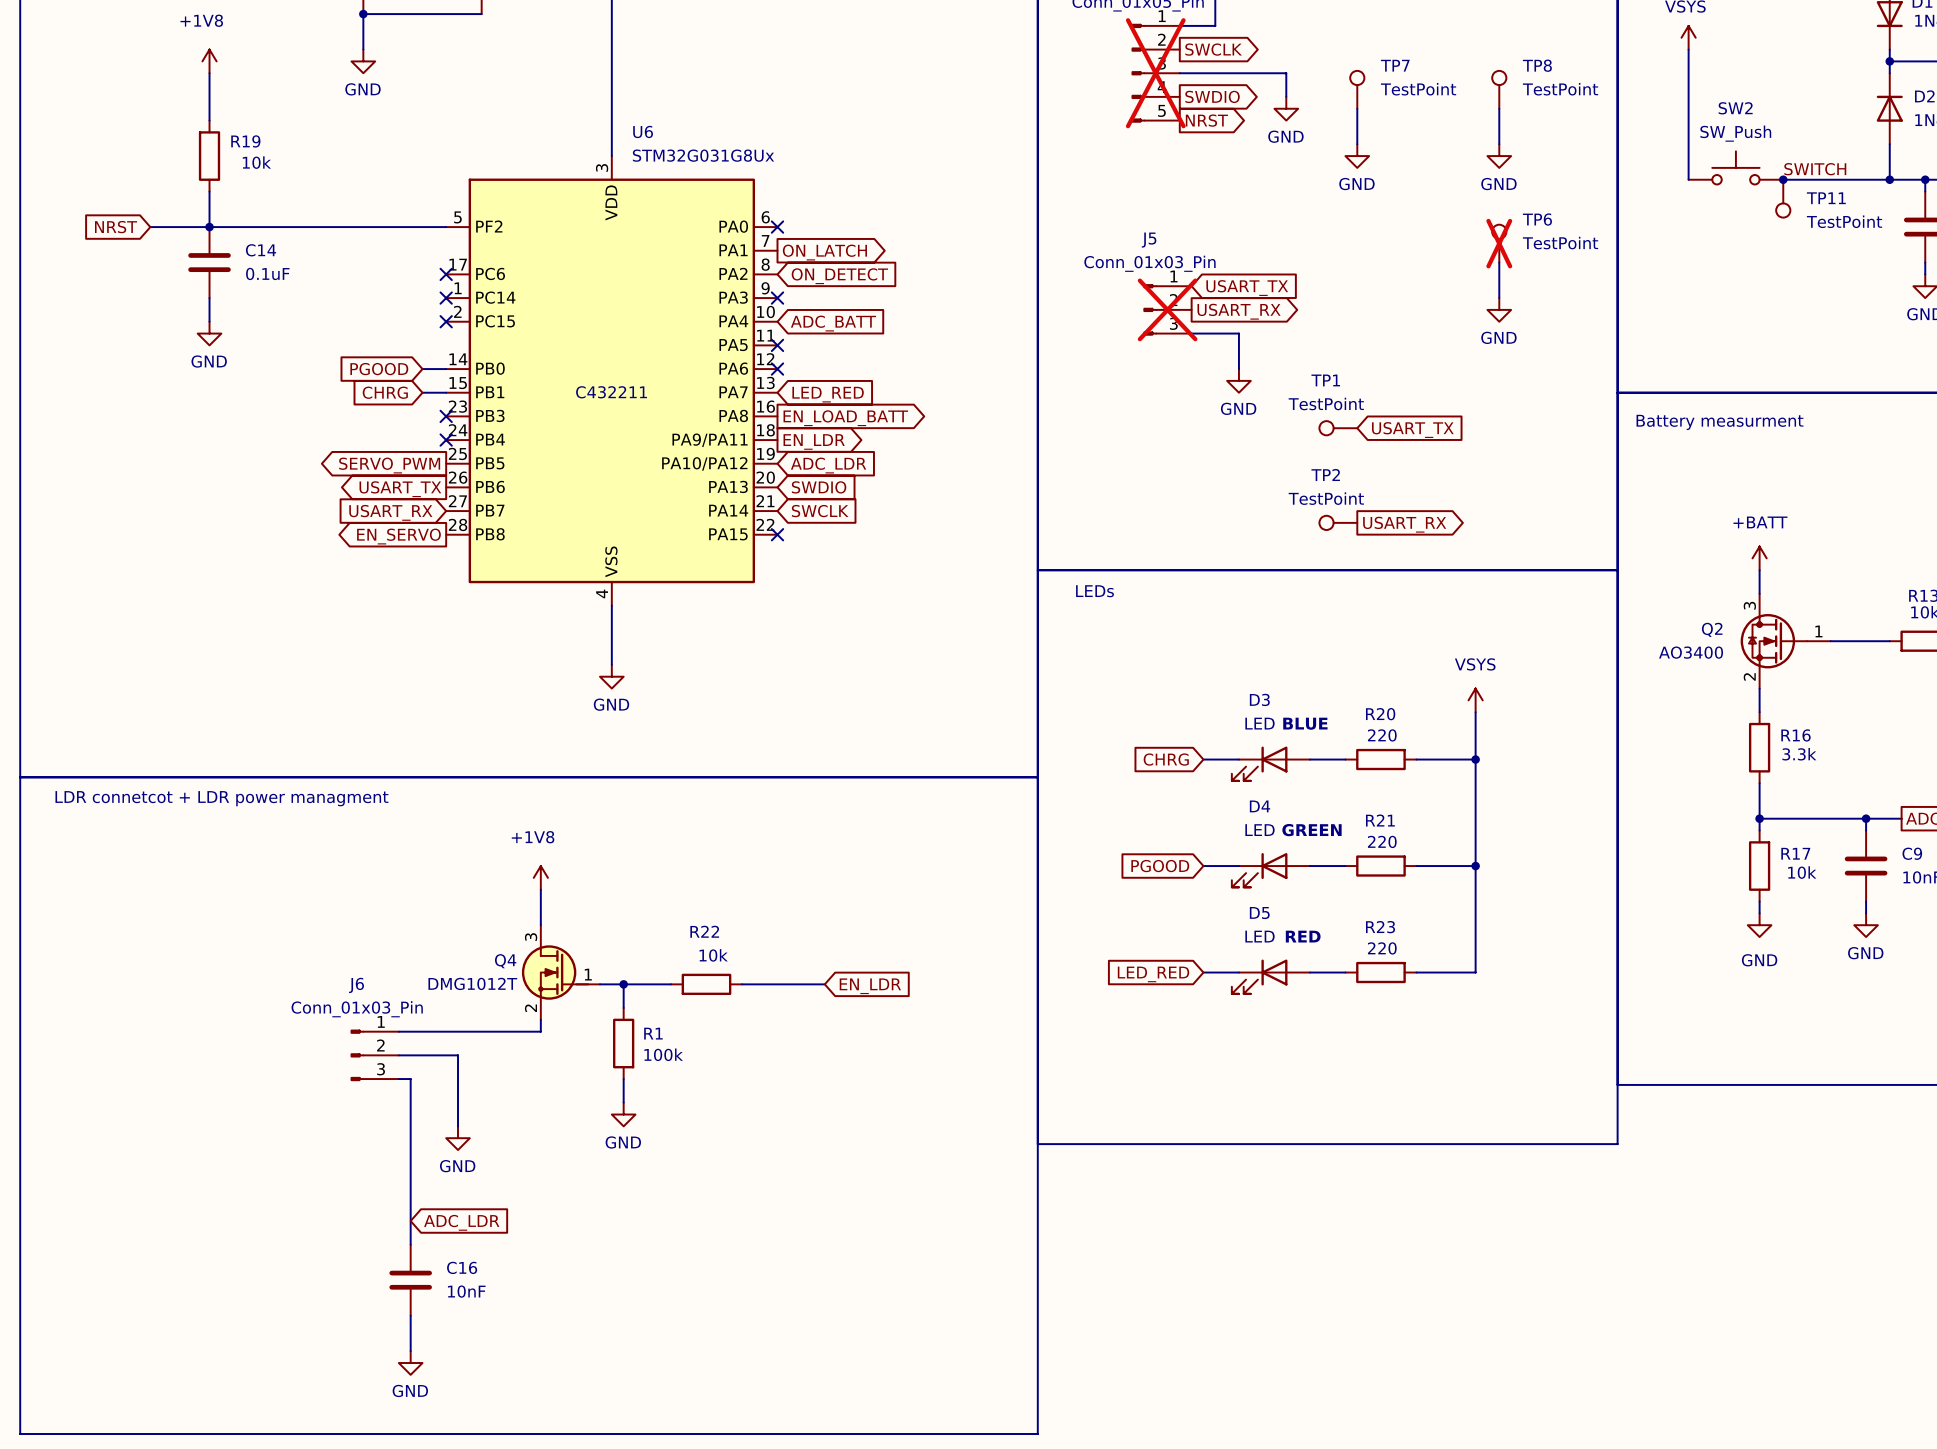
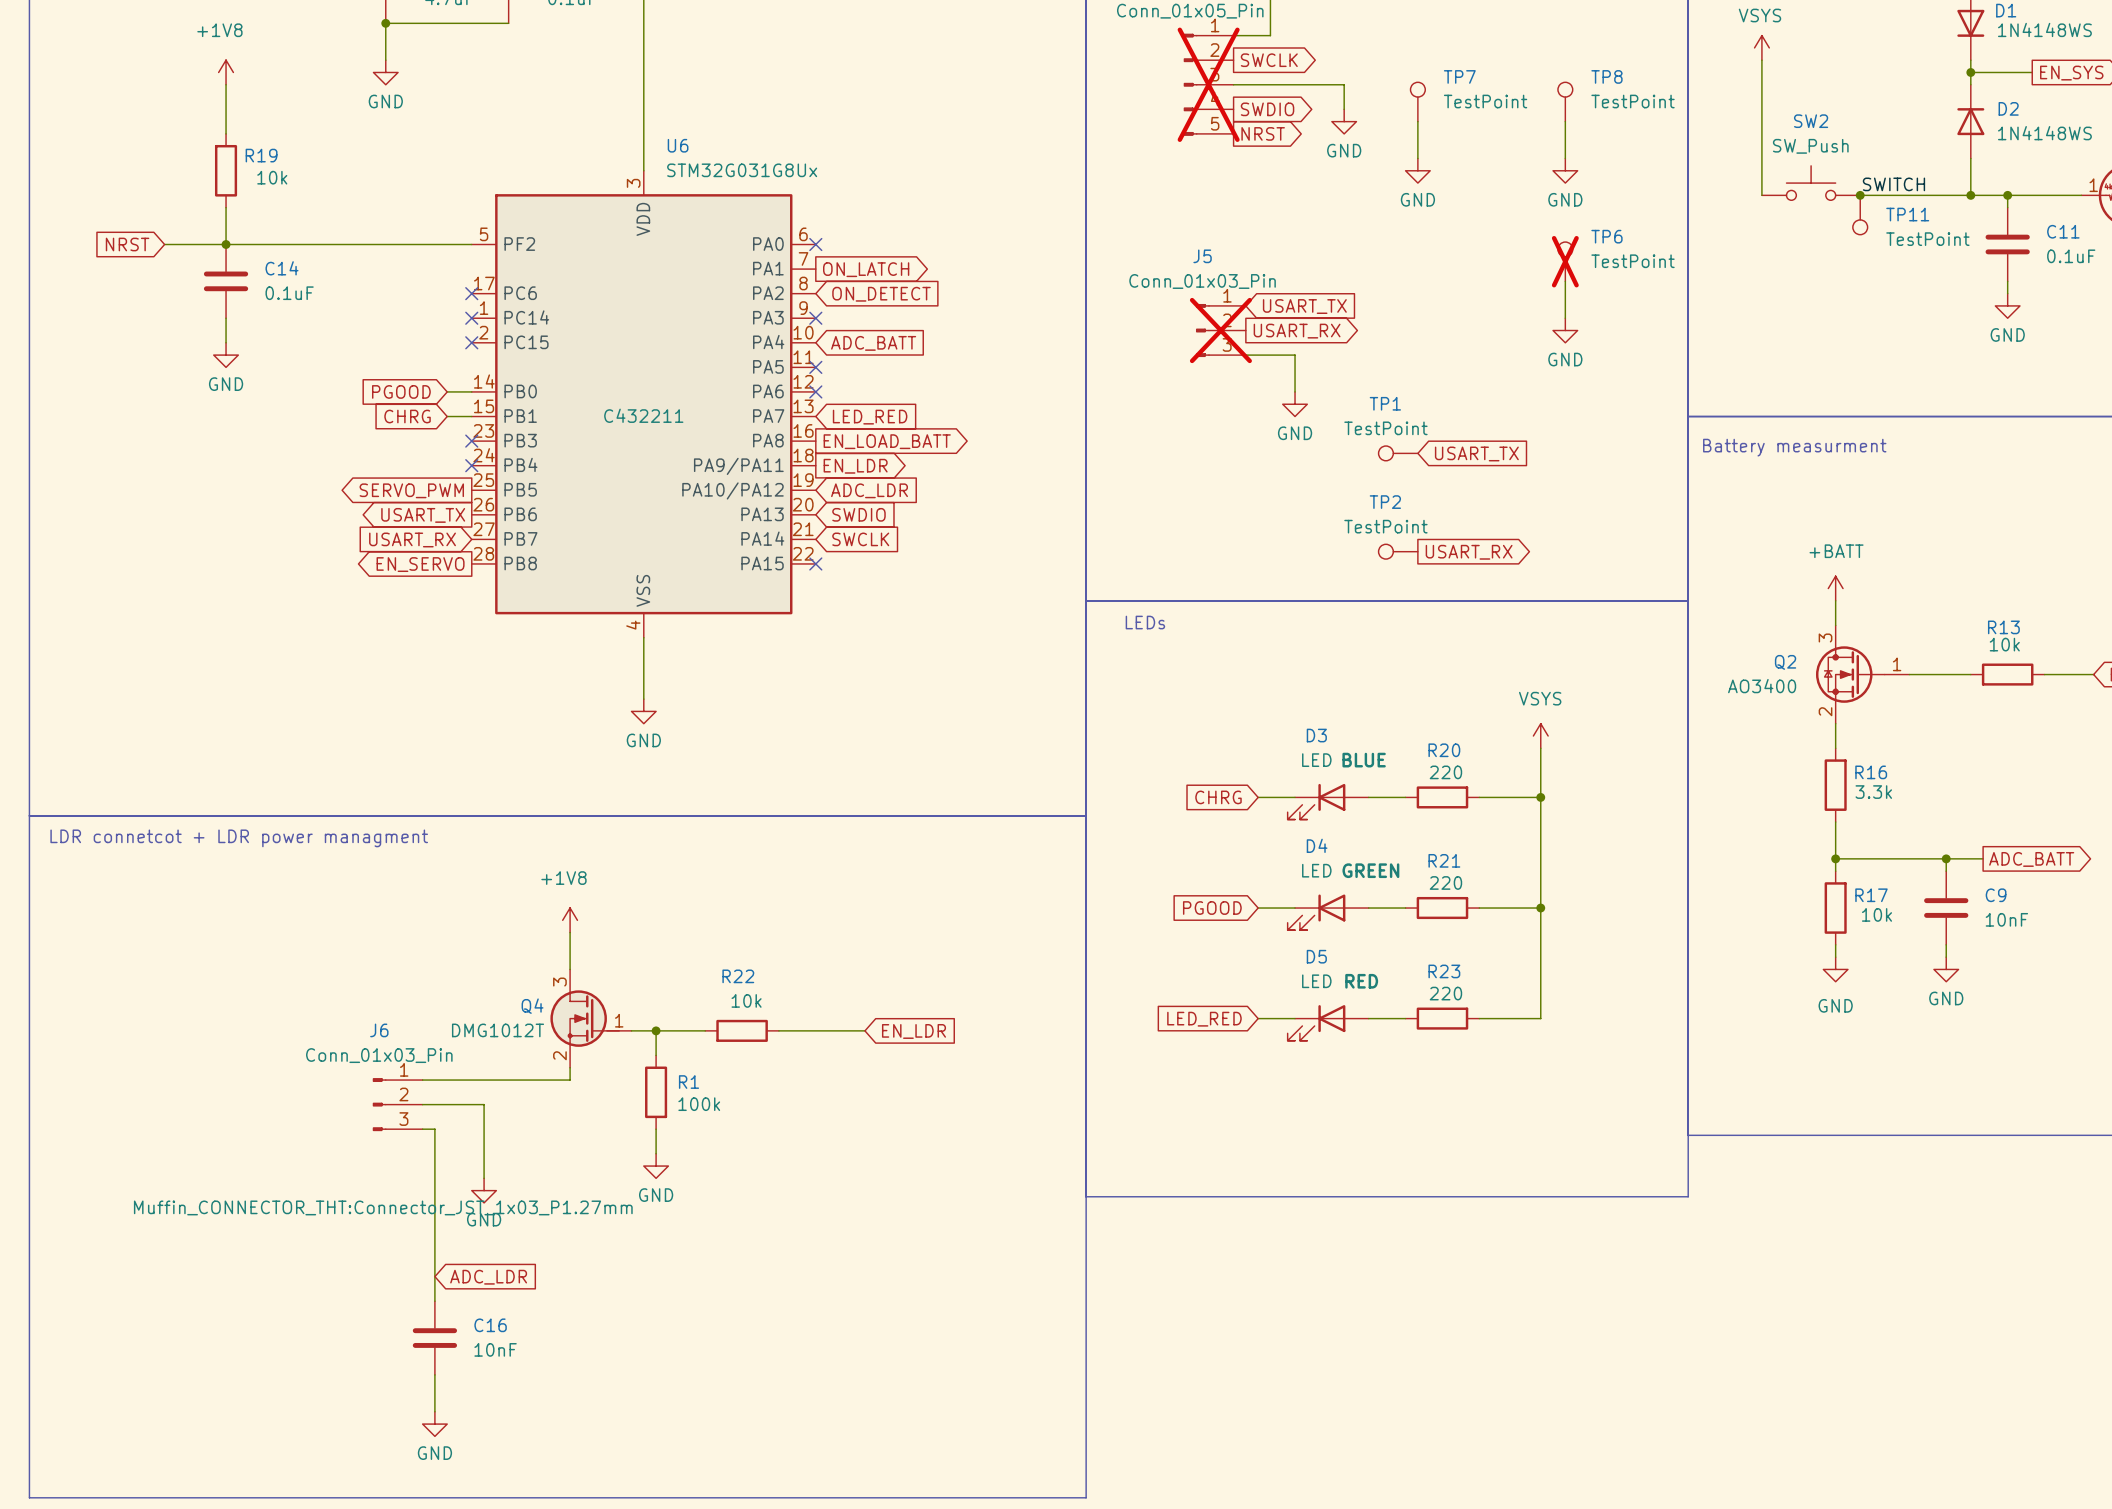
J6 text: none -> Muffin_CONNECTOR_THT:Connector_JST_1x03_P1.27mm (383, 1207)

